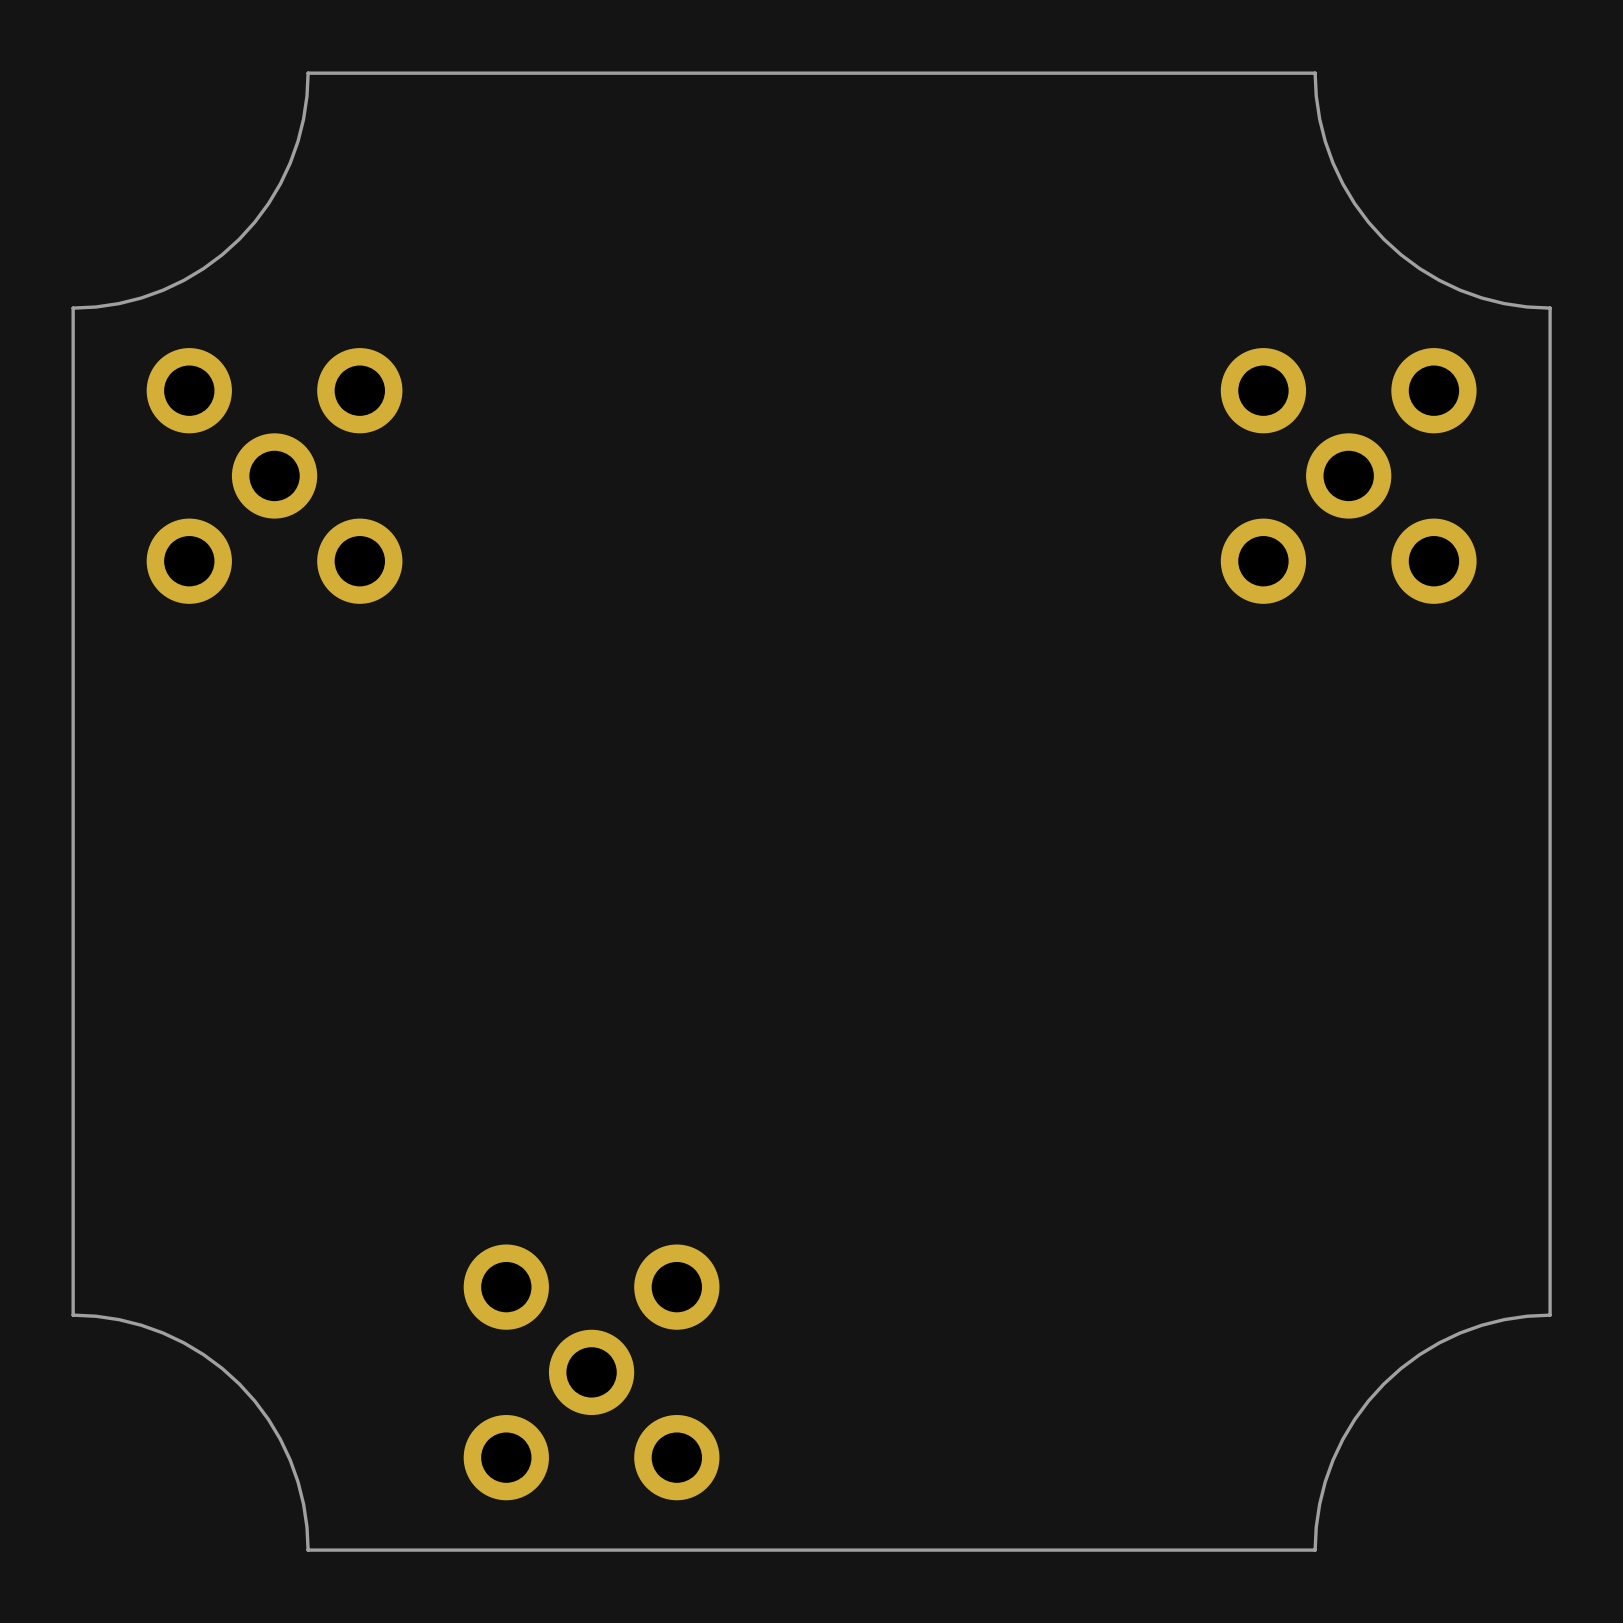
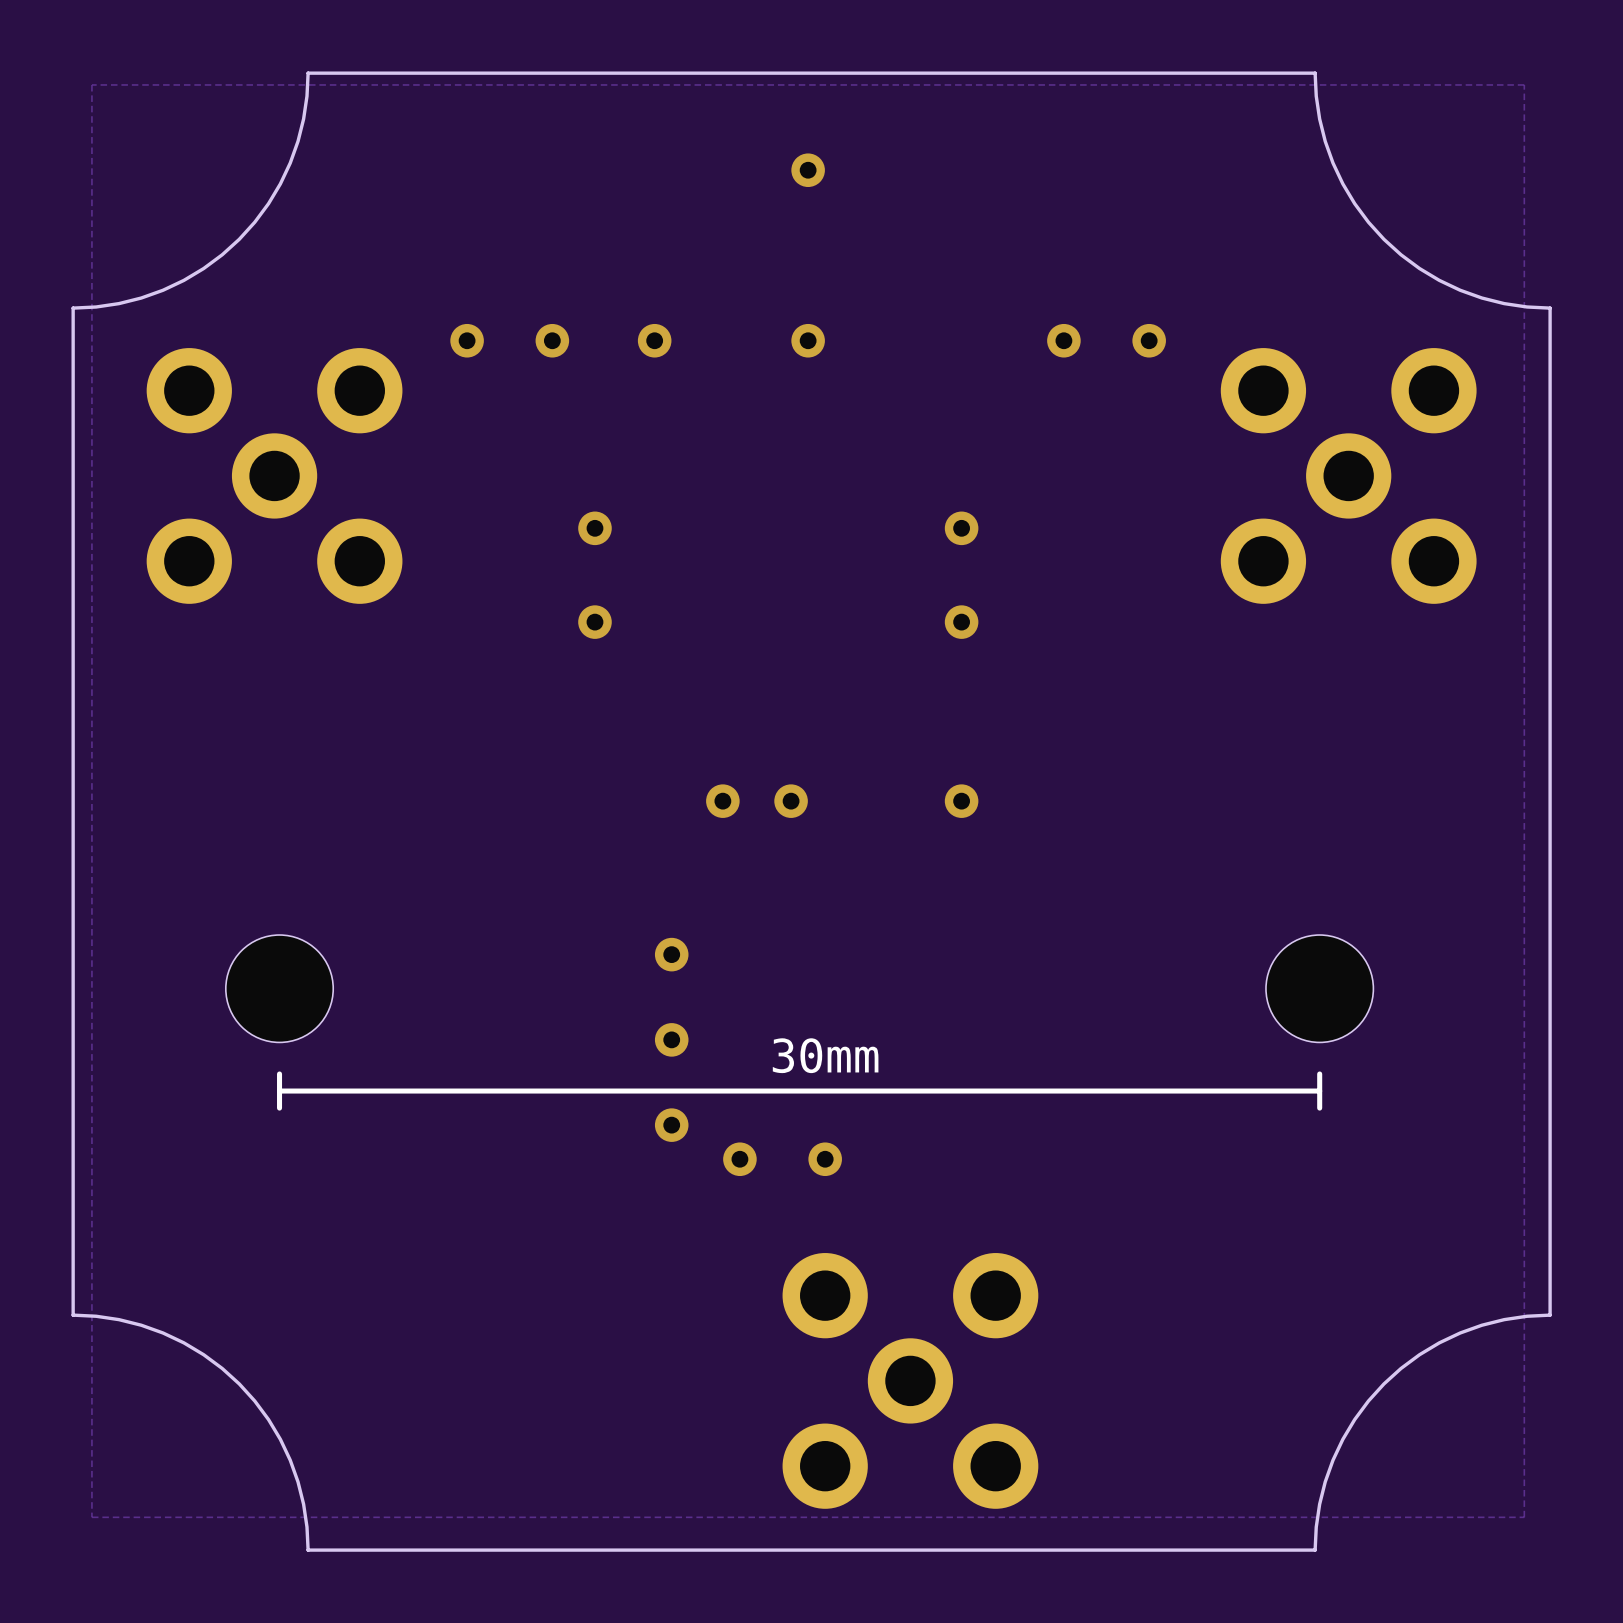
zone outline: none -> (1524, 84) (91, 84) (91, 1517) (1524, 1517) (1524, 84)
via: none -> (808, 170)
via: none -> (467, 340)
via: none -> (552, 340)
via: none -> (654, 340)
via: none -> (808, 340)
via: none -> (1063, 340)
via: none -> (1149, 340)
via: none -> (594, 528)
via: none -> (961, 528)
via: none -> (594, 622)
via: none -> (961, 622)
via: none -> (722, 801)
via: none -> (791, 801)
via: none -> (961, 801)
via: none -> (671, 954)
part: none -> (279, 988)
part: none -> (1319, 988)
via: none -> (671, 1039)
text: none -> 30mm (825, 1055)
line: none -> (279, 1073) (279, 1108)
line: none -> (1319, 1073) (1319, 1108)
line: none -> (1319, 1091) (279, 1091)
via: none -> (671, 1125)
via: none -> (739, 1159)
via: none -> (825, 1159)
part position: (591, 1372) -> (910, 1380)

